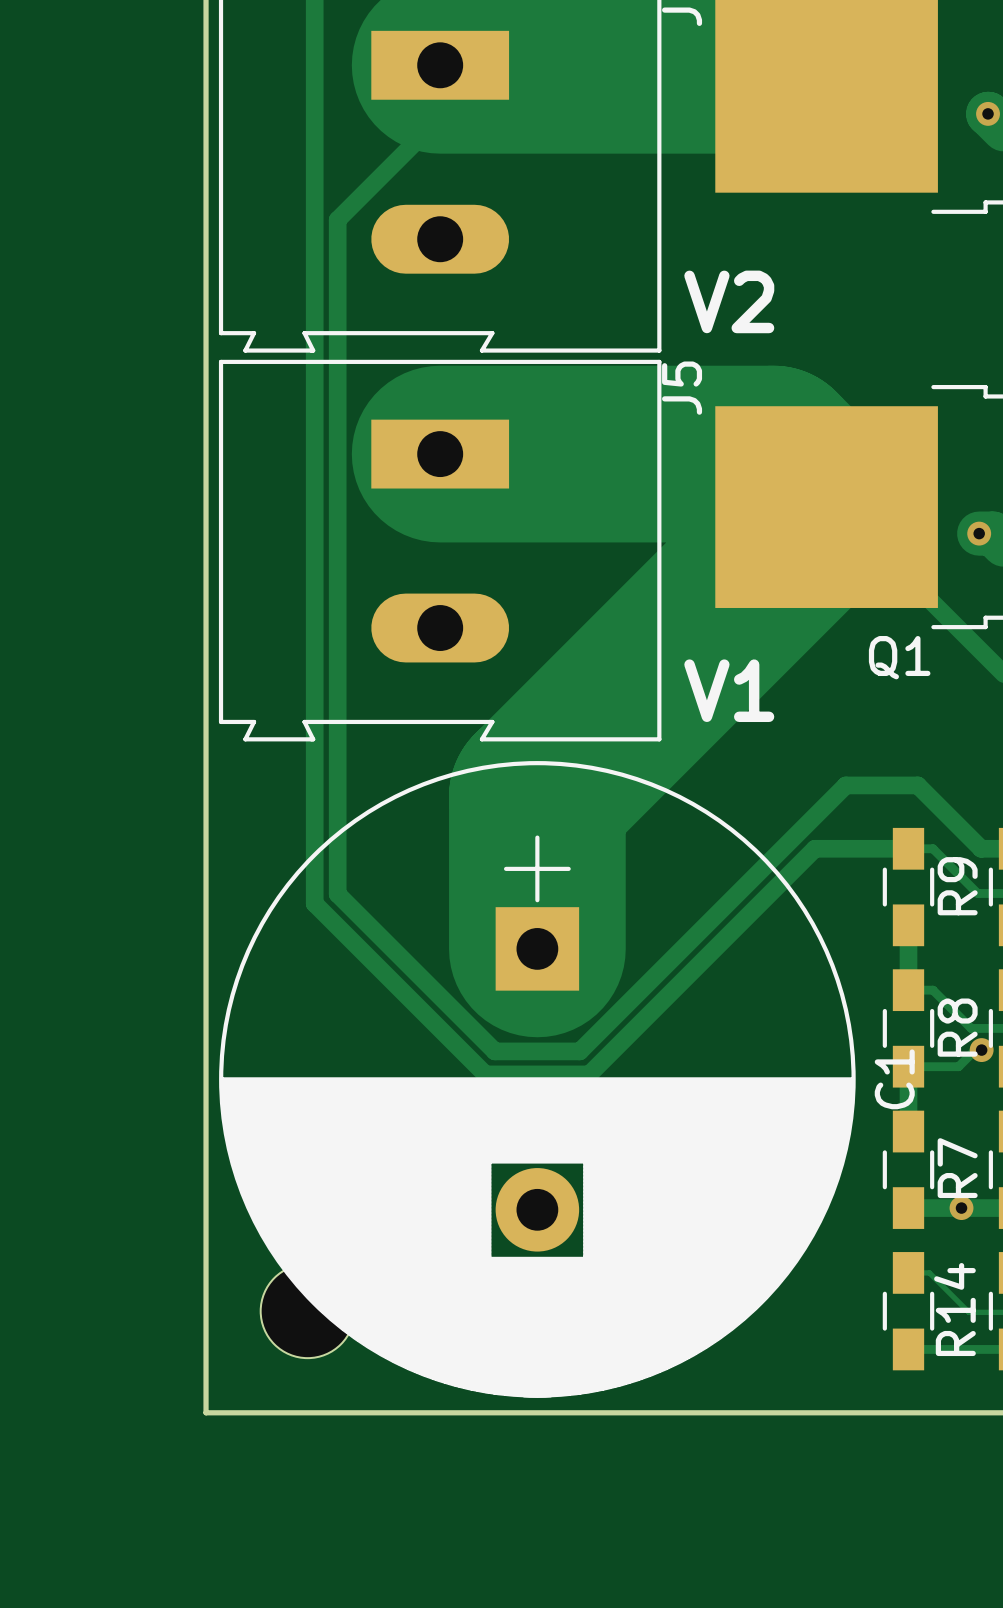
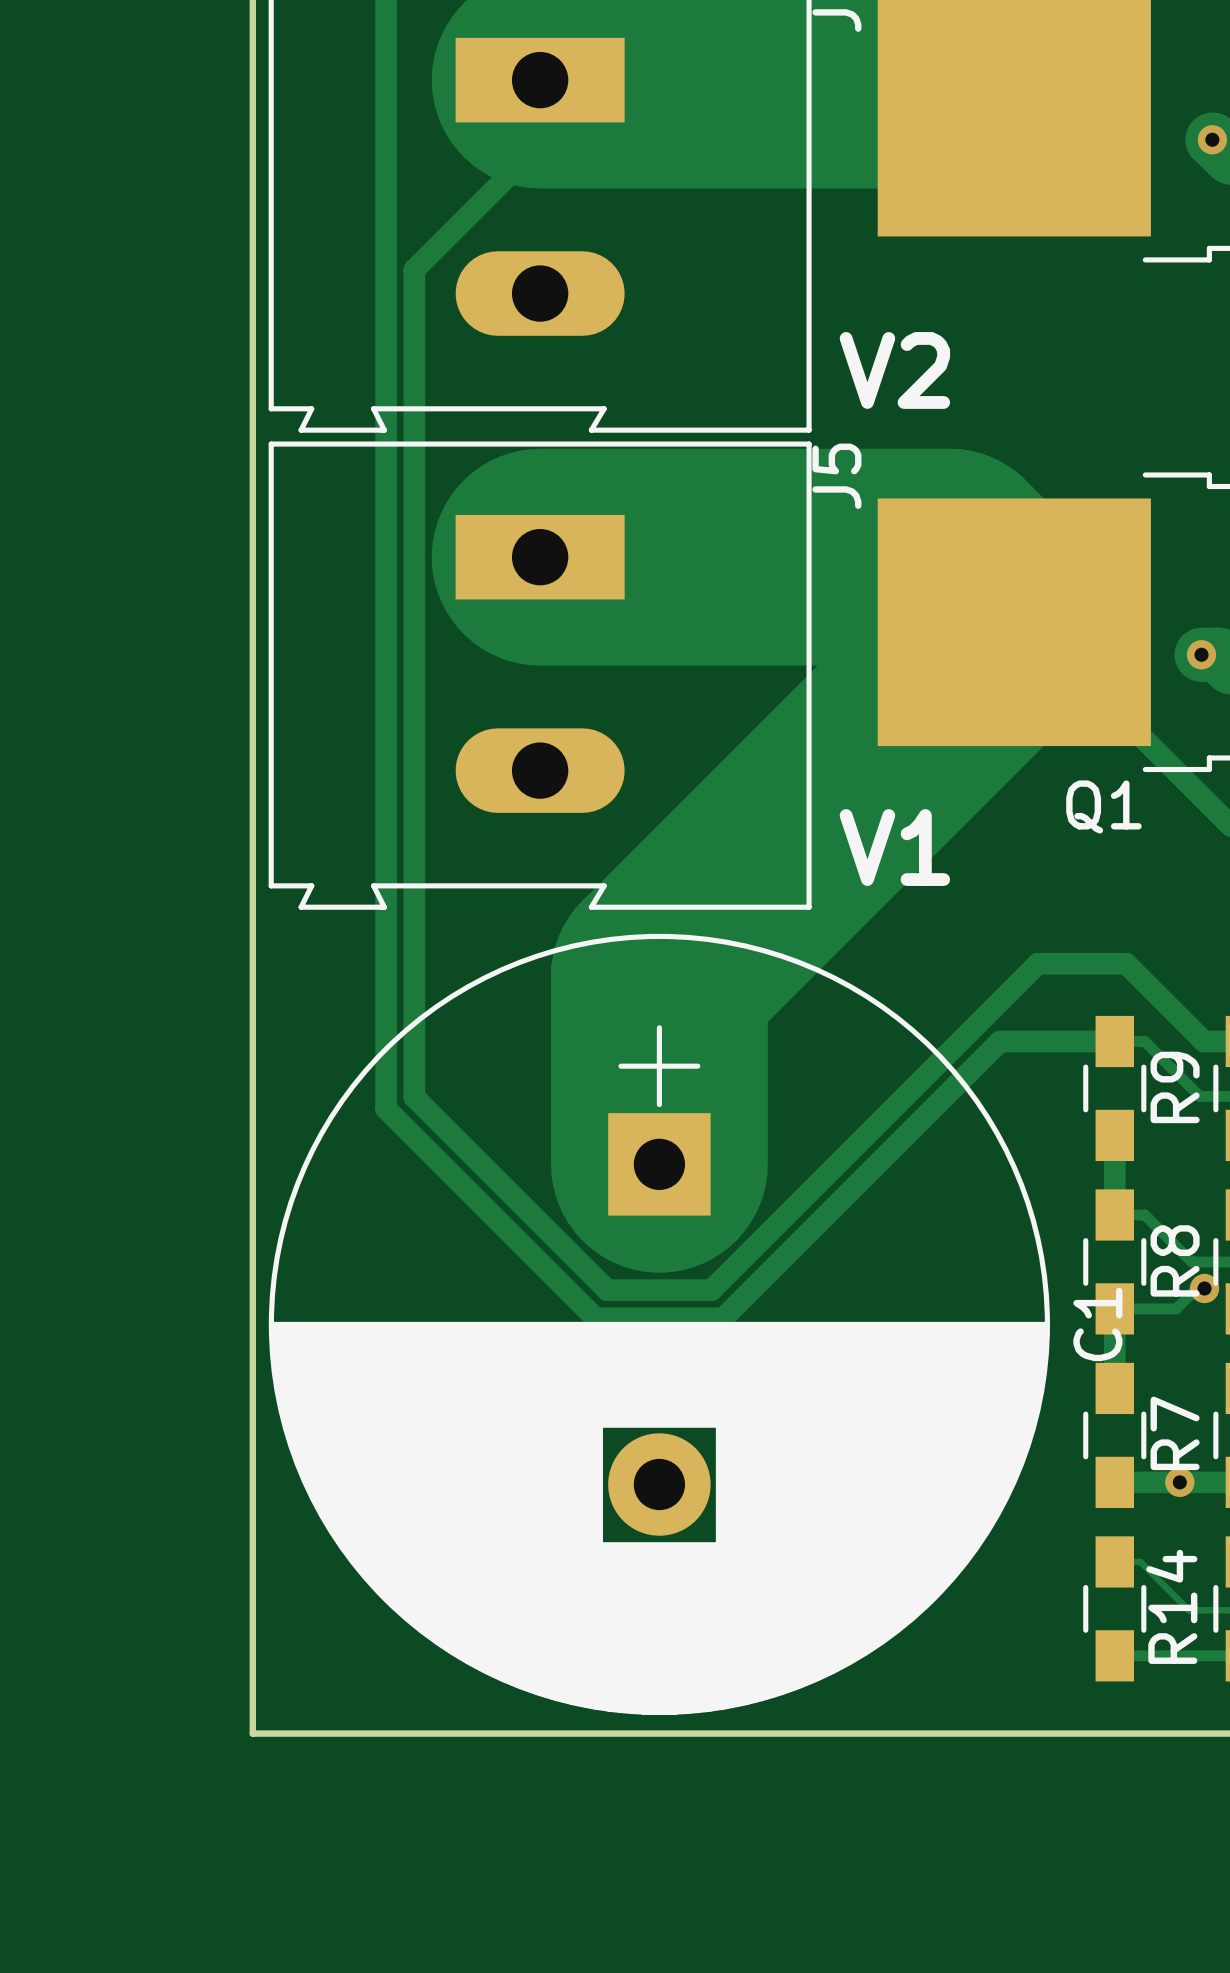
part: (307, 1311) -> none

